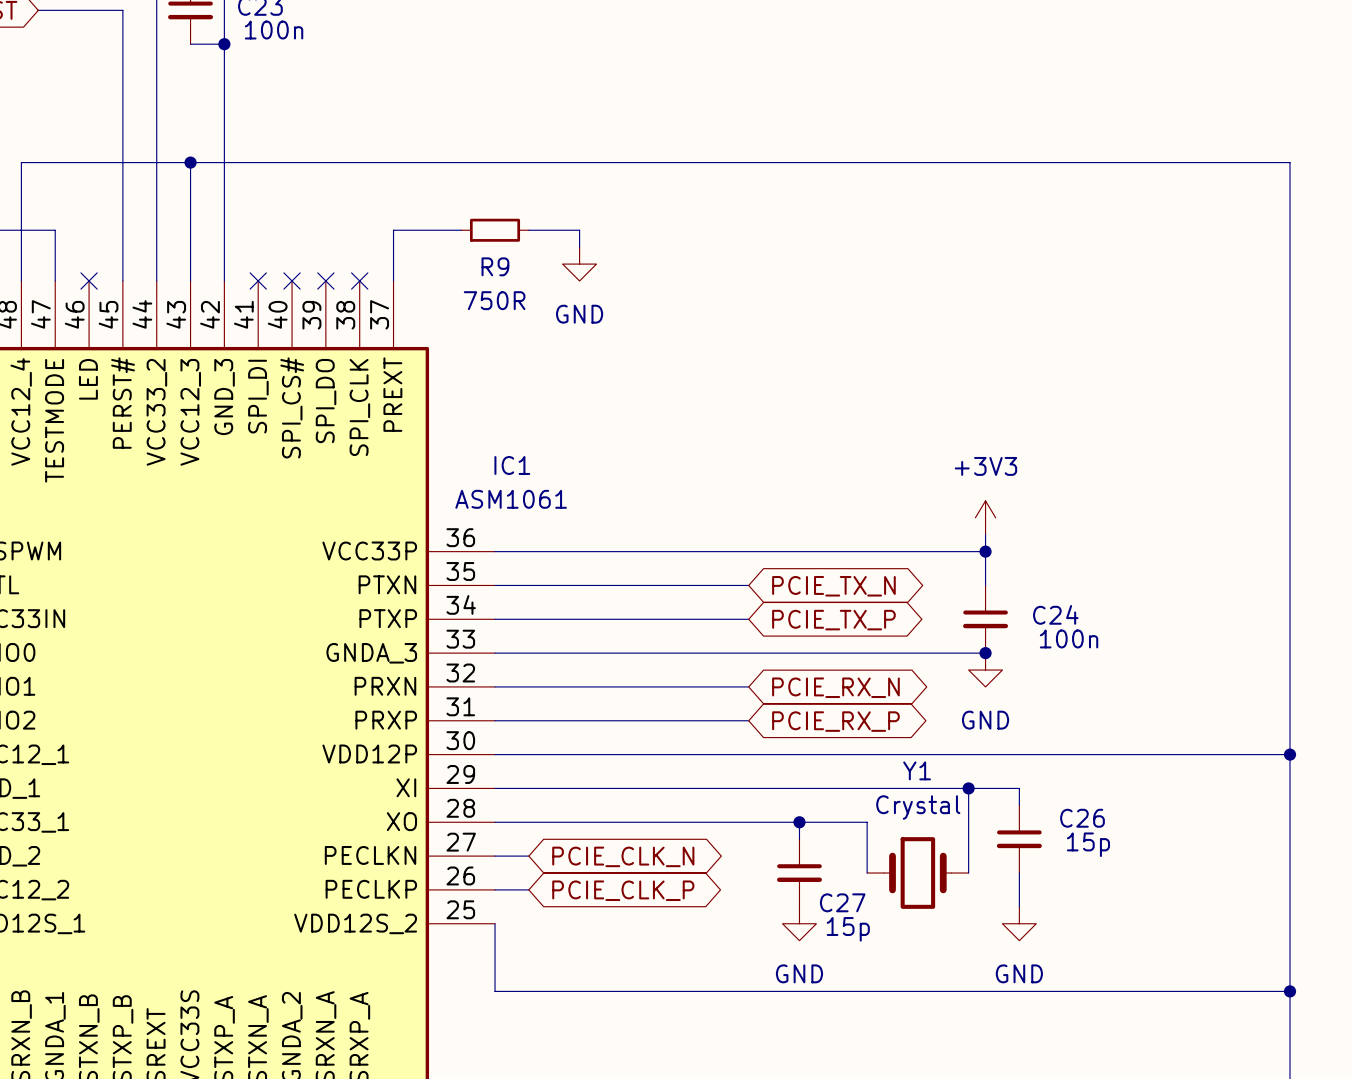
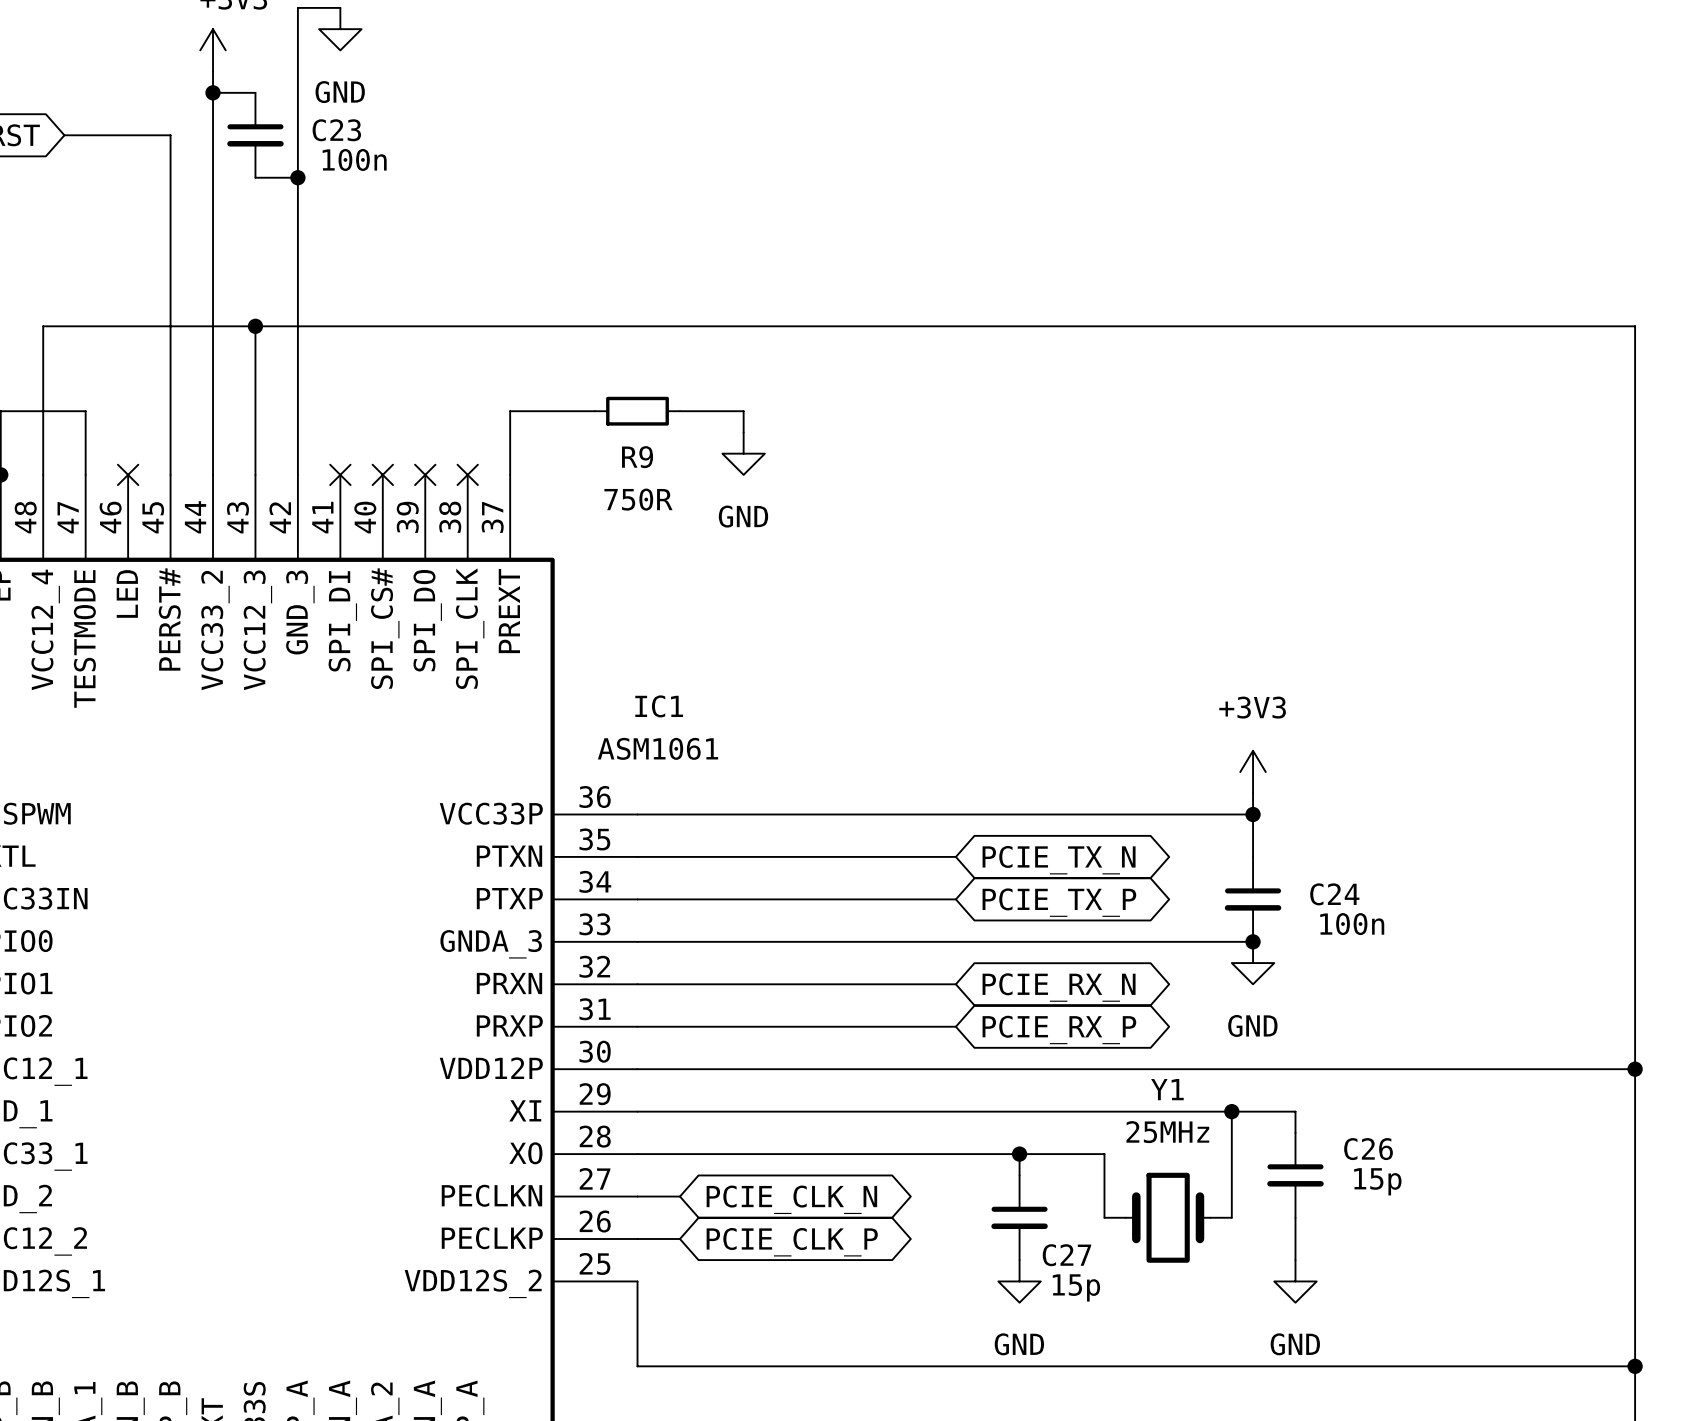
Y1 value: Crystal (918, 807) -> 25MHz (1167, 1132)

